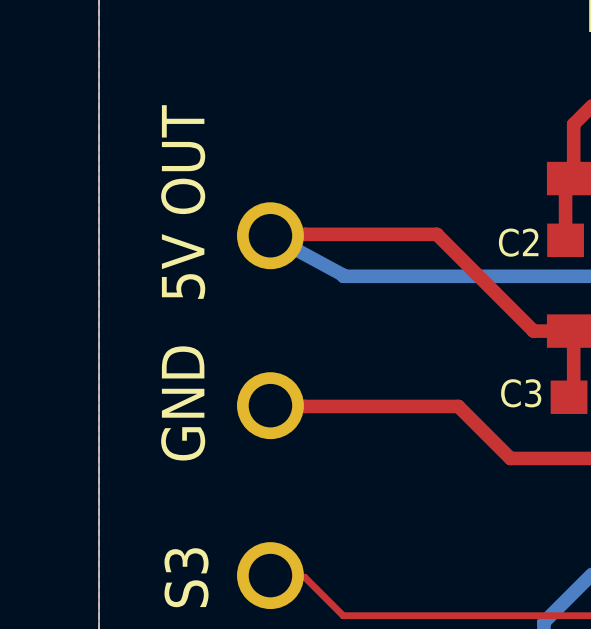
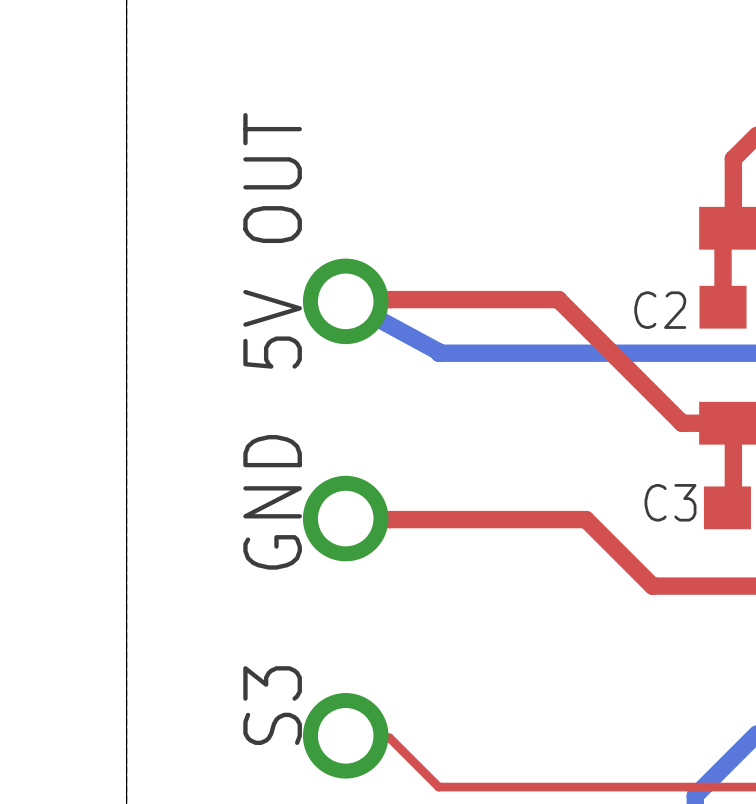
text position: 5V OUT (183, 202) -> 5V OUT (272, 240)
text position: GND (183, 403) -> GND (272, 502)
text position: S3 (186, 577) -> S3 (272, 705)

